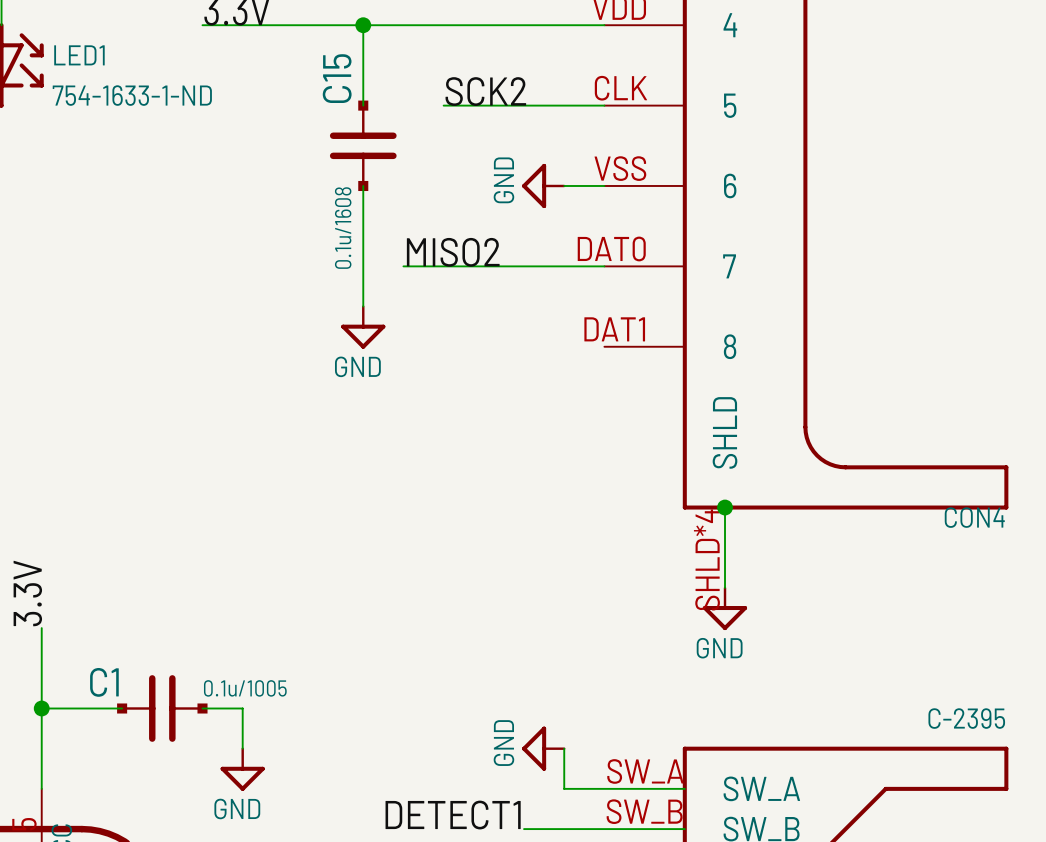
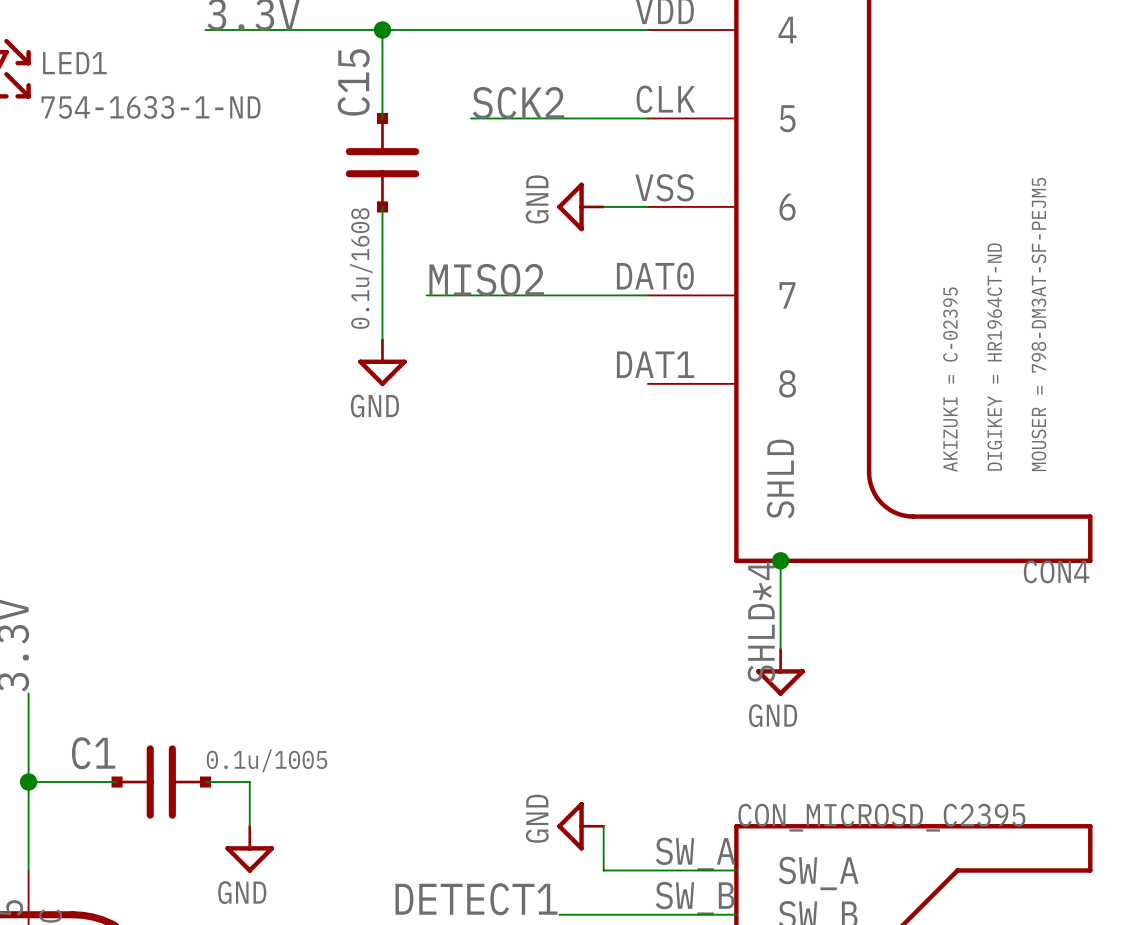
CON4 text: none -> MOUSER = 798-DM3AT-SF-PEJM5 (1038, 324)
CON4 text: none -> DIGIKEY = HR1964CT-ND (994, 357)
CON4 text: none -> AKIZUKI = C-02395 (950, 379)
part value: C-2395 (966, 718) -> CON_MICROSD_C2395 (881, 817)

